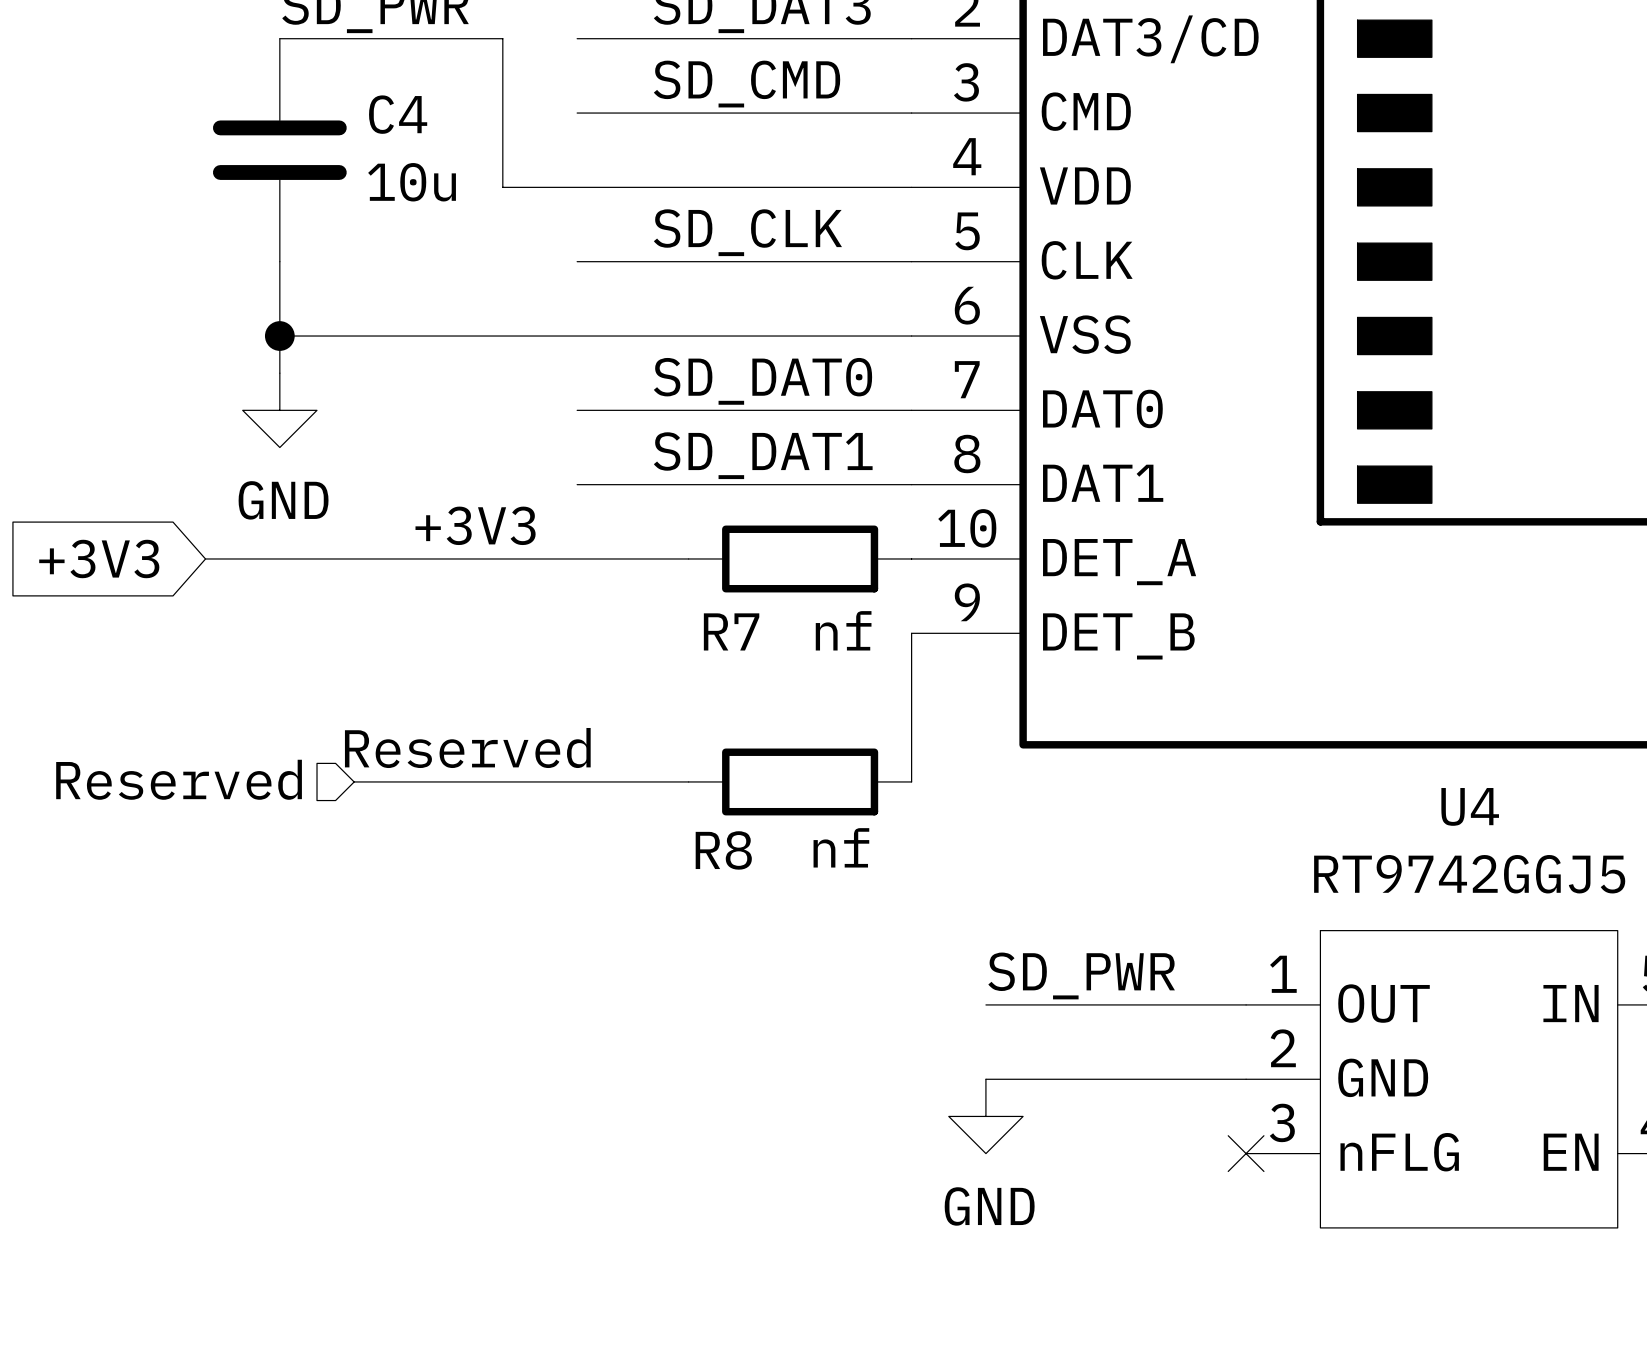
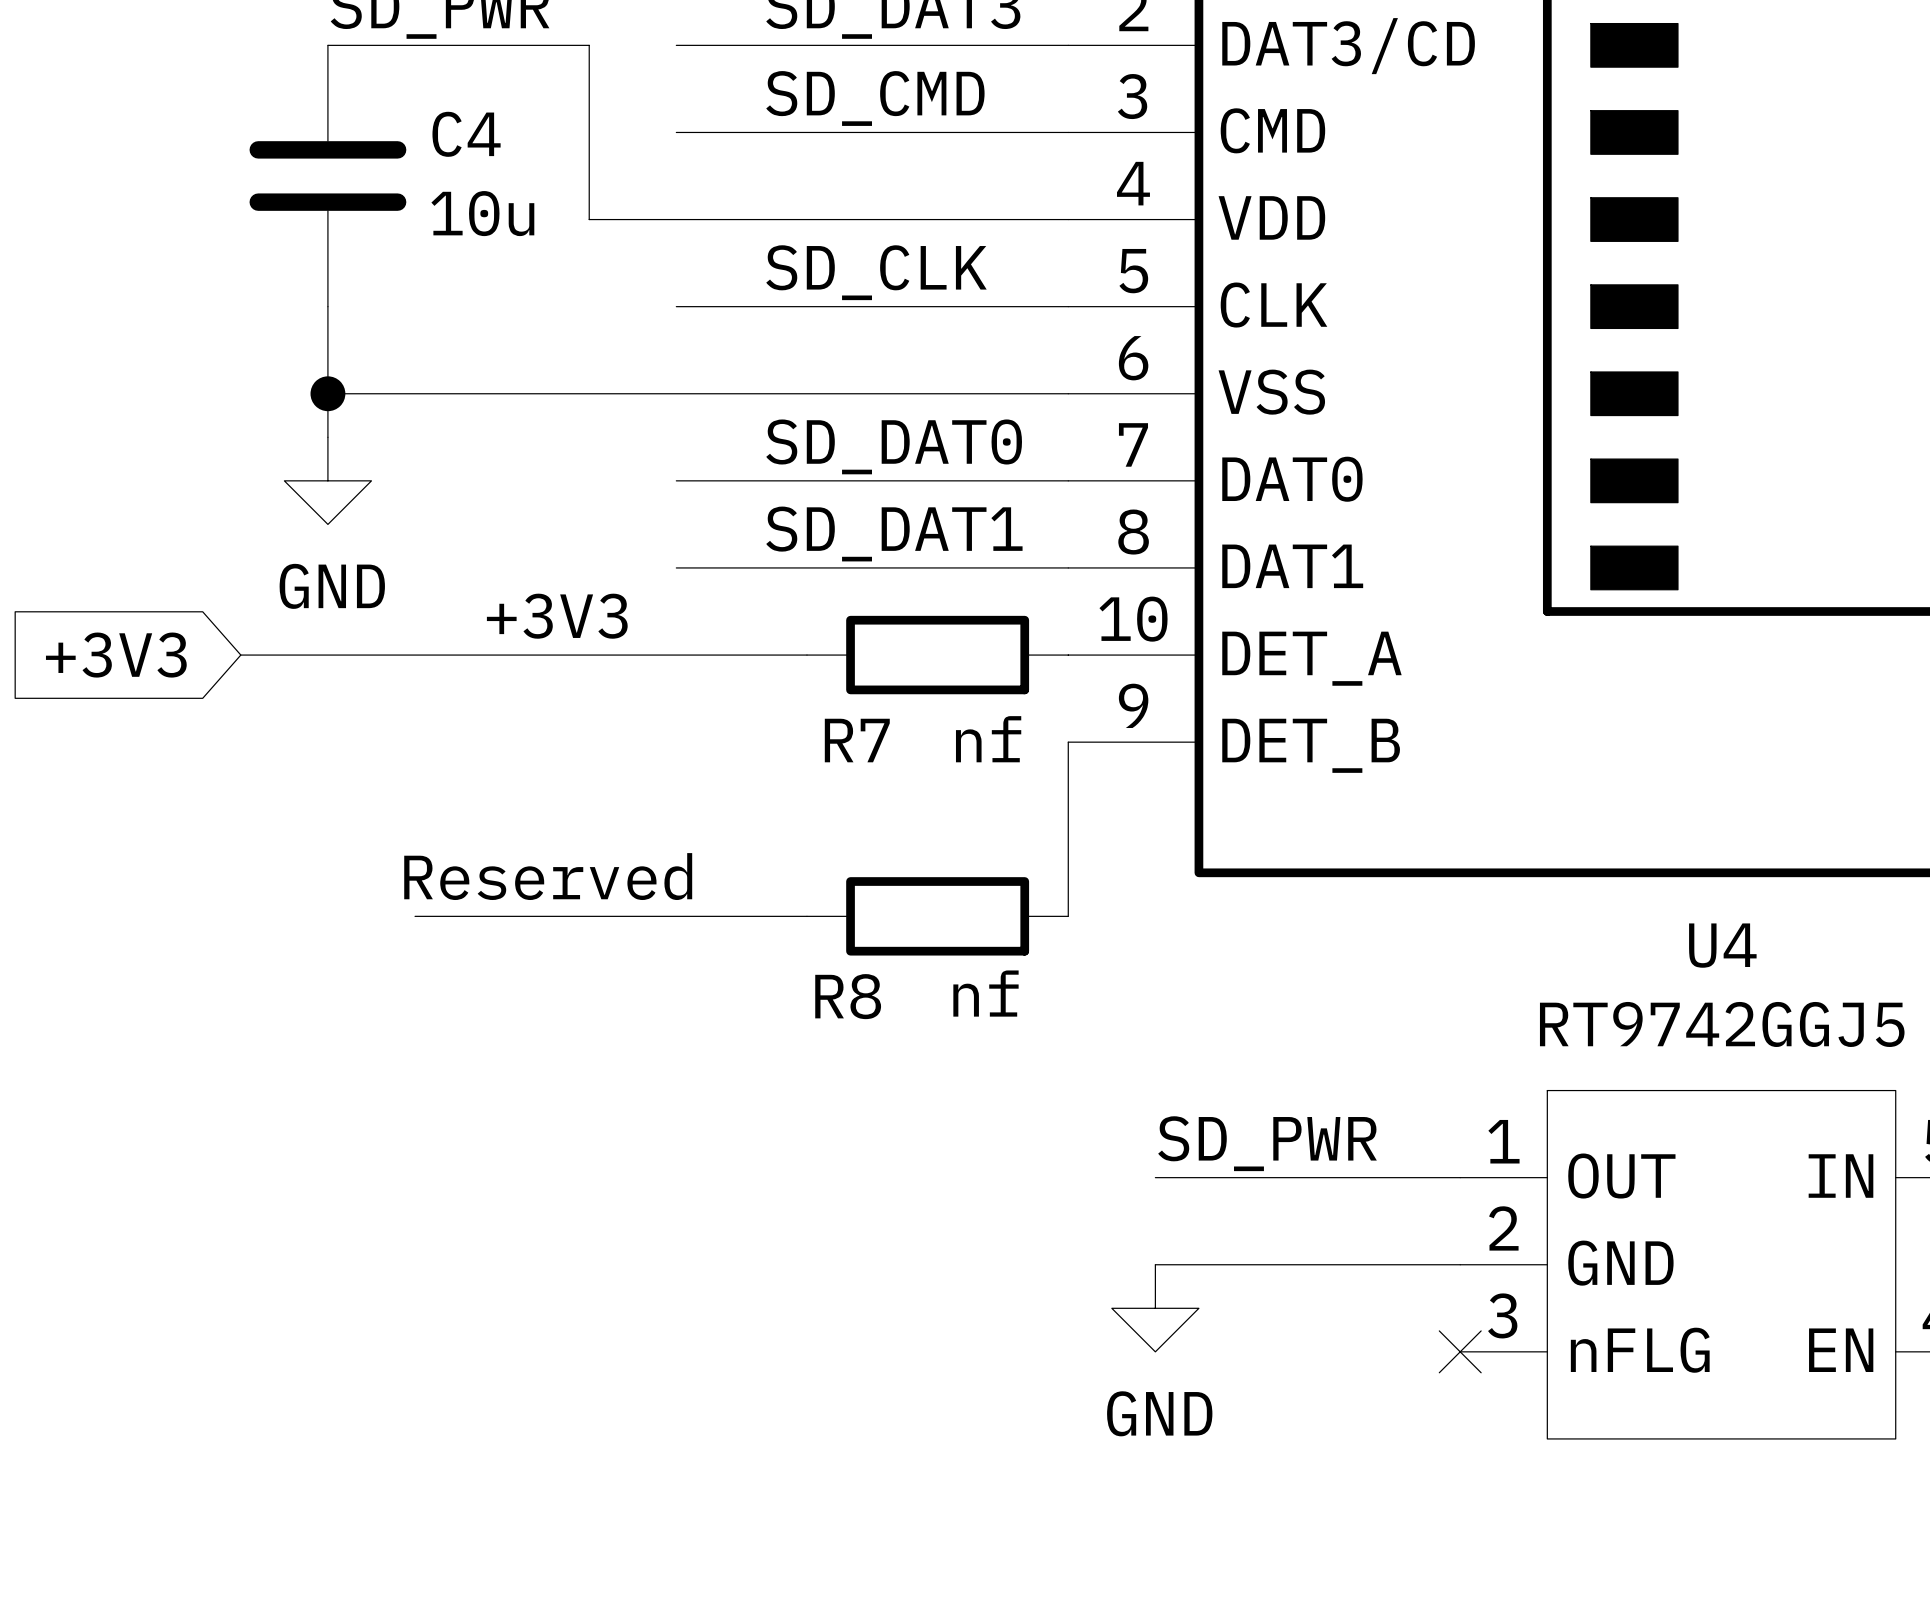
hierarchical label: Reserved (179, 779) -> none

